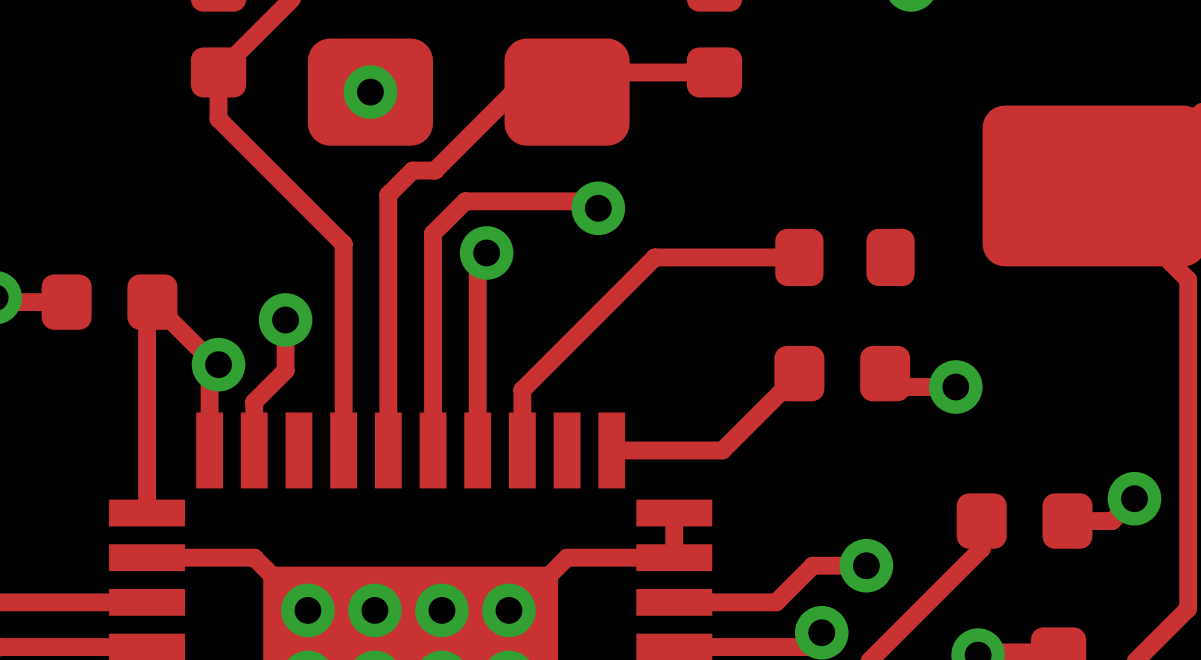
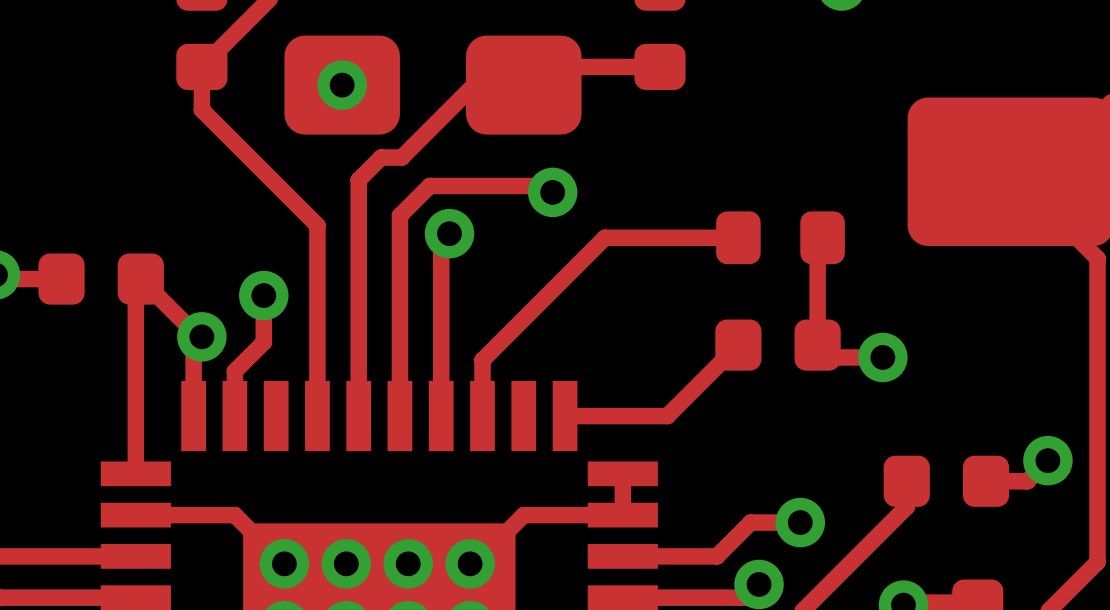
top track: none -> (822, 237) (817, 242) (817, 345)

